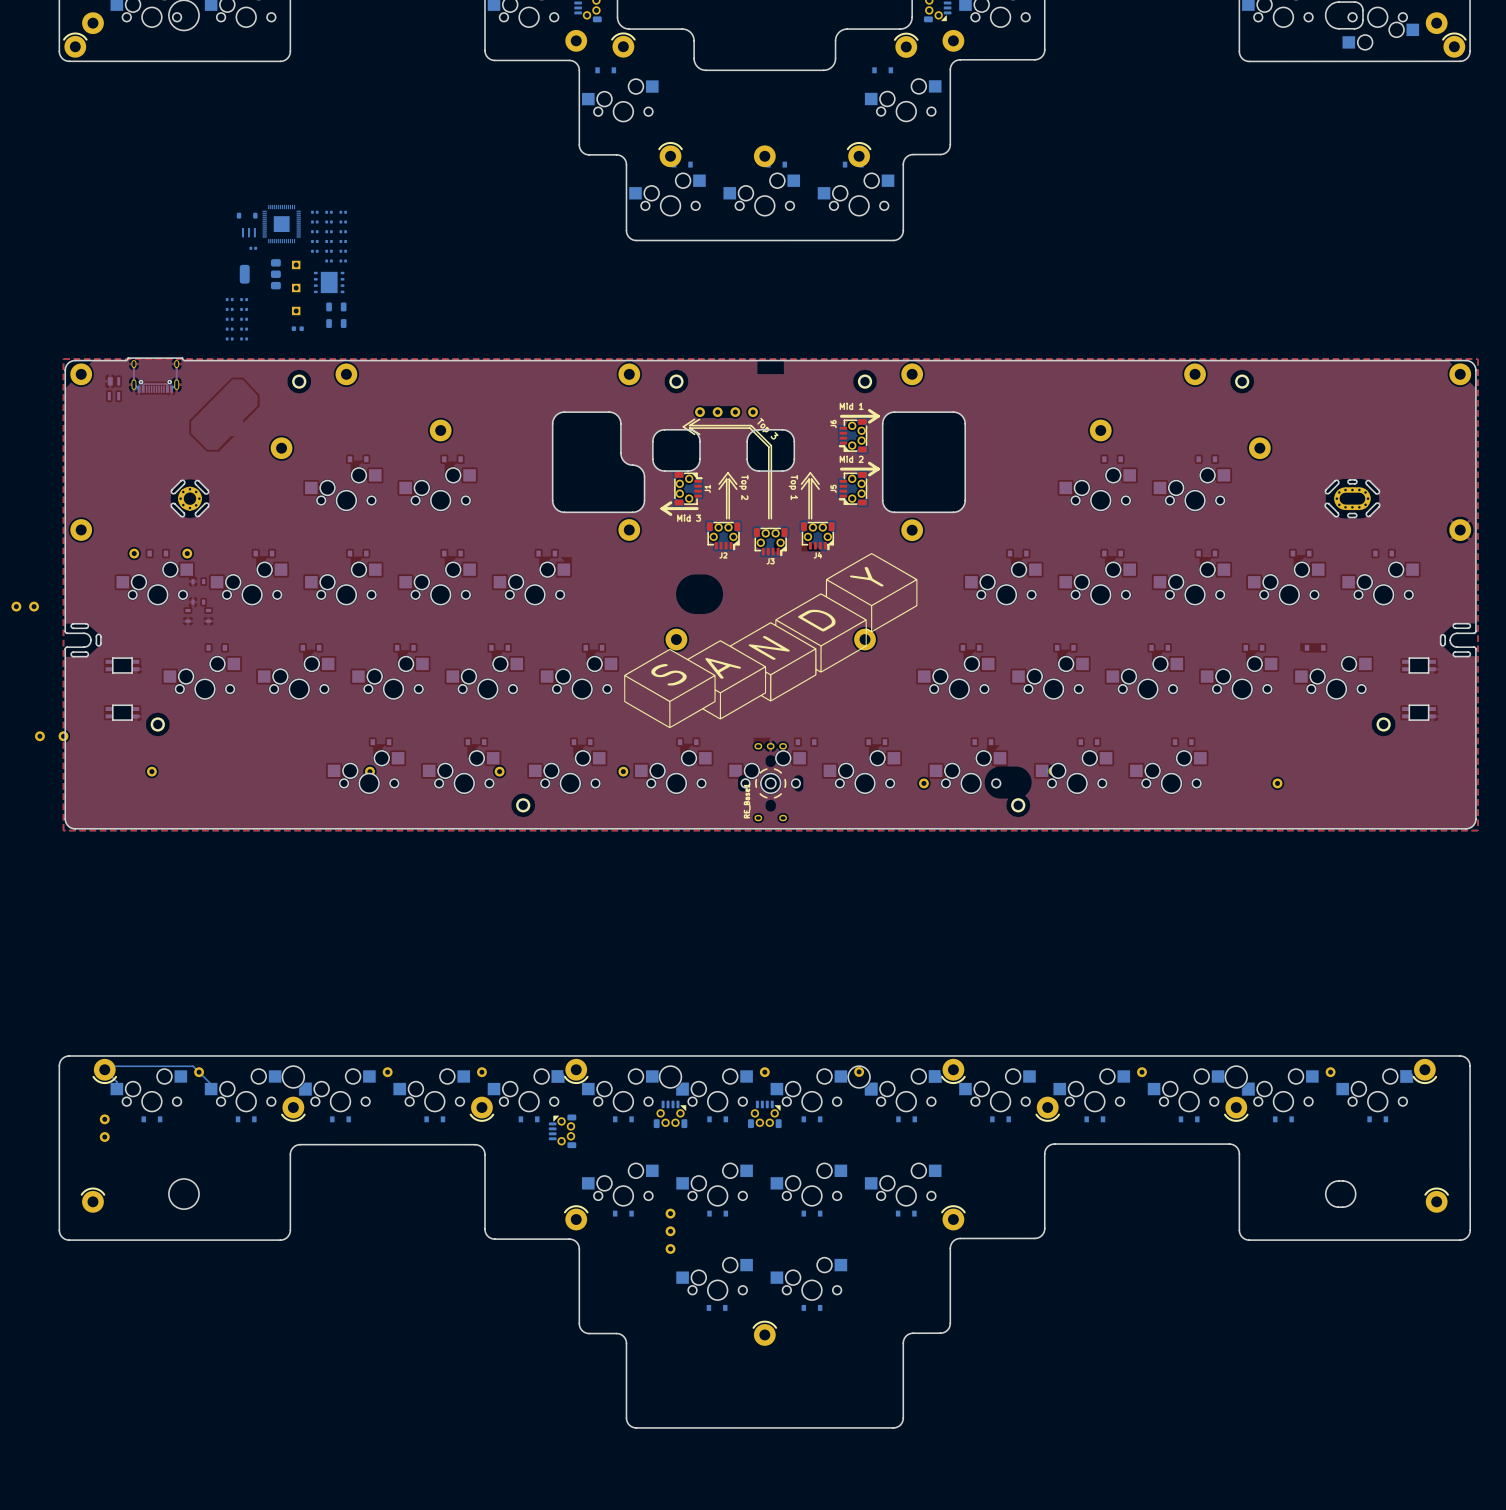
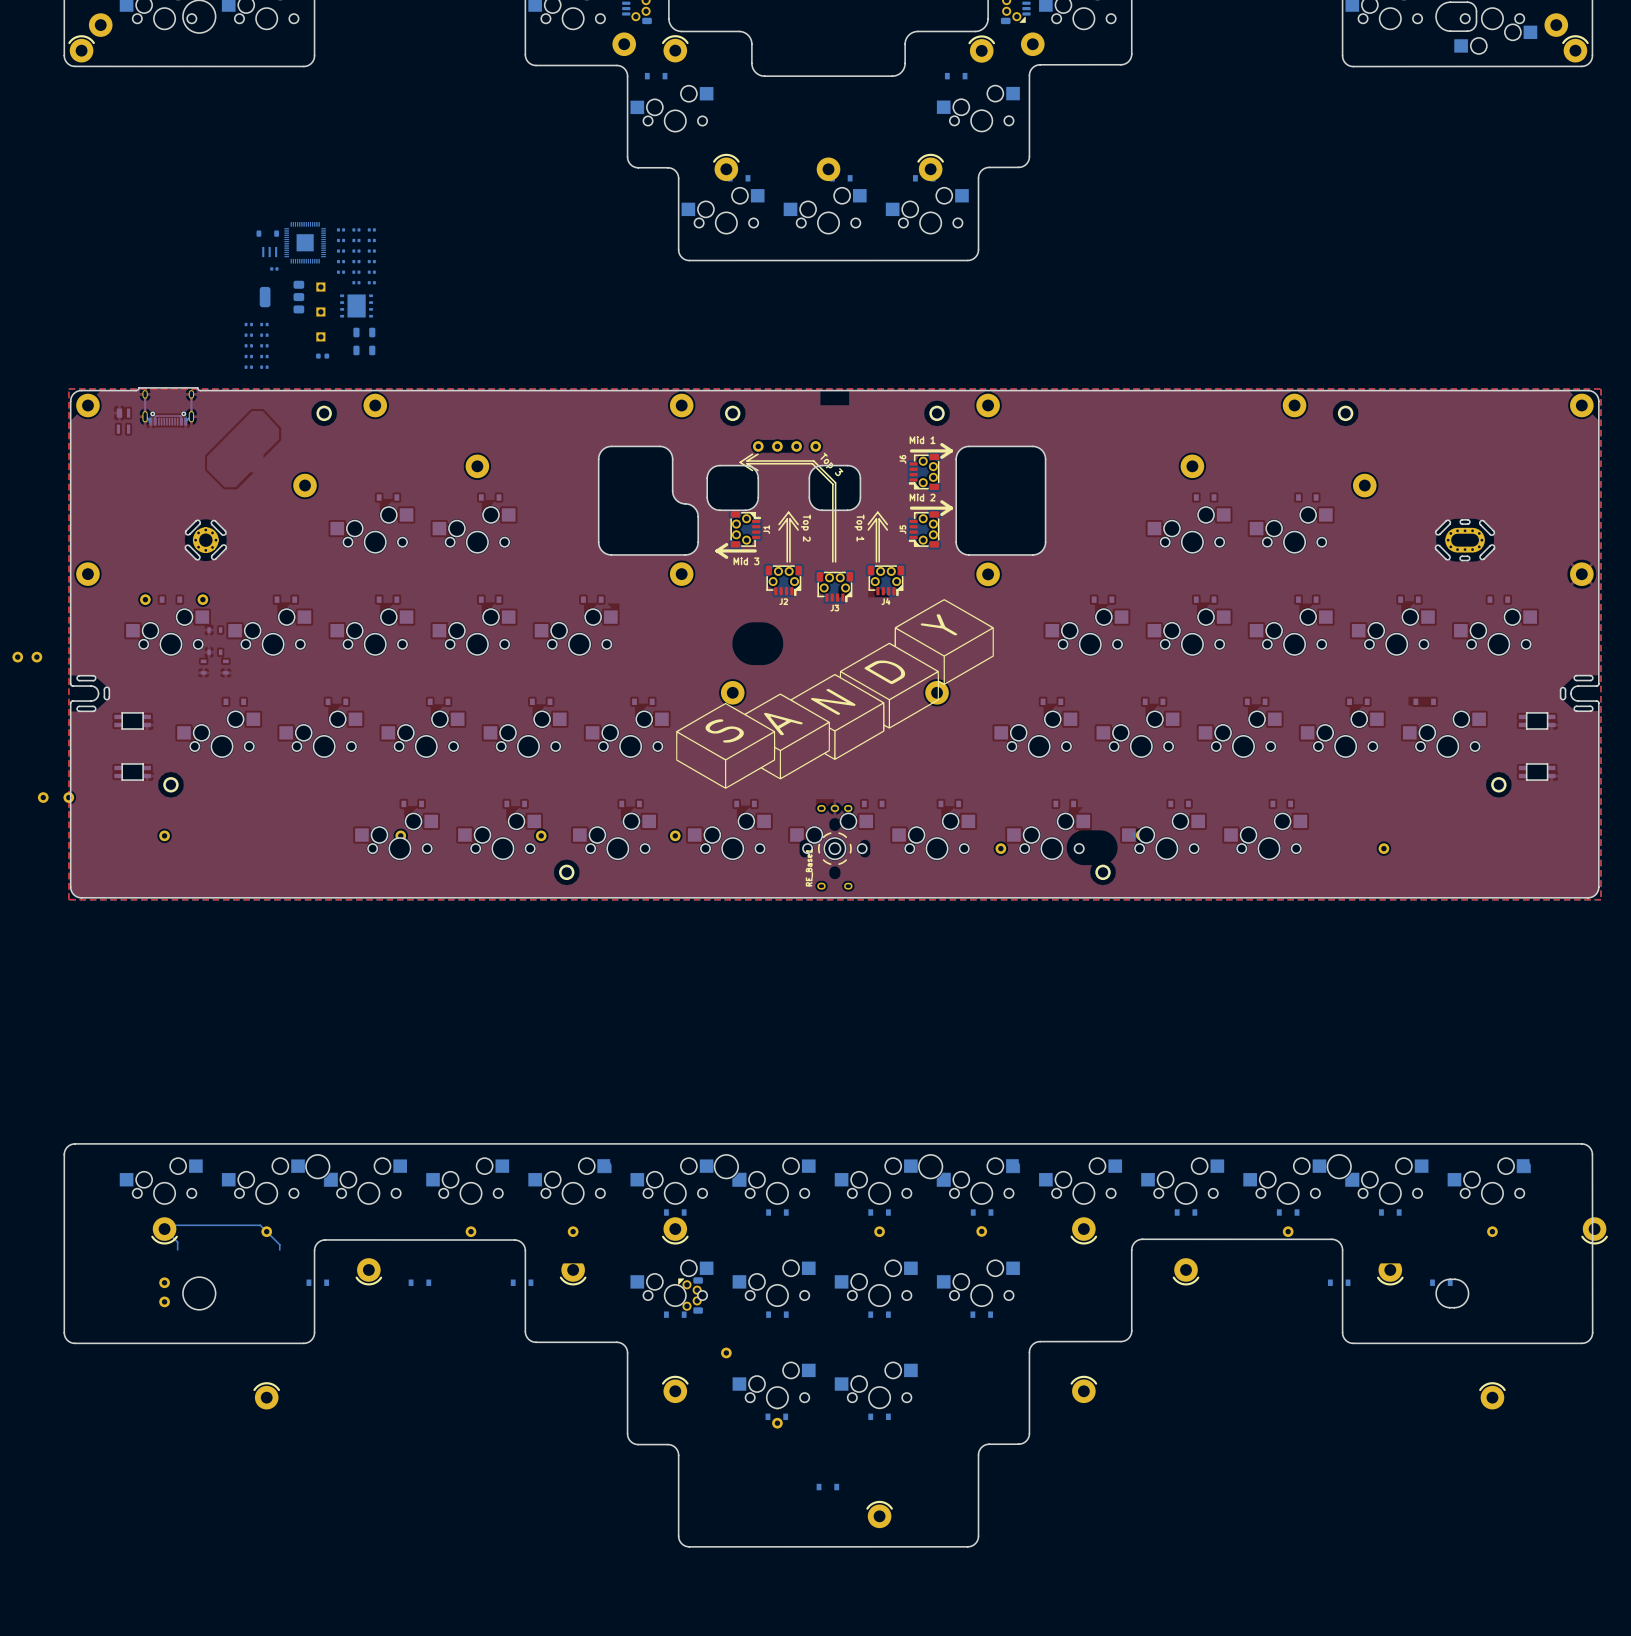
part: (104, 1071) -> none
part: (576, 1071) -> none
part: (859, 1071) -> none
part: (953, 1071) -> none
part: (1424, 1071) -> none
part: (199, 1072) -> none
part: (387, 1072) -> none
part: (481, 1072) -> none
part: (764, 1072) -> none
part: (1141, 1072) -> none
part: (1330, 1072) -> none
bottom track: (116, 1089) (116, 1081) (104, 1069) (108, 1066) (193, 1066) (211, 1084) (211, 1089) -> (177, 1249) (177, 1242) (164, 1229) (168, 1225) (260, 1225) (279, 1244) (279, 1249)
part: (293, 1109) -> none
part: (481, 1109) -> none
part: (1047, 1109) -> none
part: (1236, 1109) -> none
part: (670, 1114) -> none
part: (764, 1114) -> none
part: (104, 1119) -> none
part: (151, 1119) -> none
part: (246, 1119) -> none
part: (340, 1119) -> none
part: (434, 1119) -> none
part: (529, 1119) -> none
part: (1000, 1119) -> none
part: (1377, 1119) -> none
part: (562, 1131) -> none
part: none -> (164, 1230)
part: none -> (675, 1230)
part: none -> (981, 1231)
part: none -> (1083, 1230)
part: none -> (1594, 1230)
part: (104, 1137) -> none
part: none -> (266, 1231)
part: none -> (471, 1231)
part: none -> (573, 1231)
part: none -> (879, 1231)
part: none -> (1288, 1231)
part: none -> (1492, 1231)
part: none -> (368, 1271)
part: none -> (573, 1271)
part: none -> (1186, 1271)
part: none -> (1390, 1271)
part: none -> (164, 1282)
part: none -> (317, 1282)
part: none -> (419, 1282)
part: none -> (522, 1282)
part: none -> (1339, 1282)
part: none -> (1441, 1282)
part: none -> (688, 1295)
part: (92, 1200) -> none
part: (1436, 1200) -> none
part: none -> (164, 1301)
part: (670, 1213) -> none
part: (576, 1217) -> none
part: (953, 1217) -> none
part: (670, 1231) -> none
part: none -> (675, 1389)
part: none -> (1083, 1389)
part: none -> (266, 1395)
part: none -> (1492, 1395)
part: none -> (777, 1423)
part: (764, 1333) -> none
part: none -> (827, 1487)
part: none -> (879, 1514)

